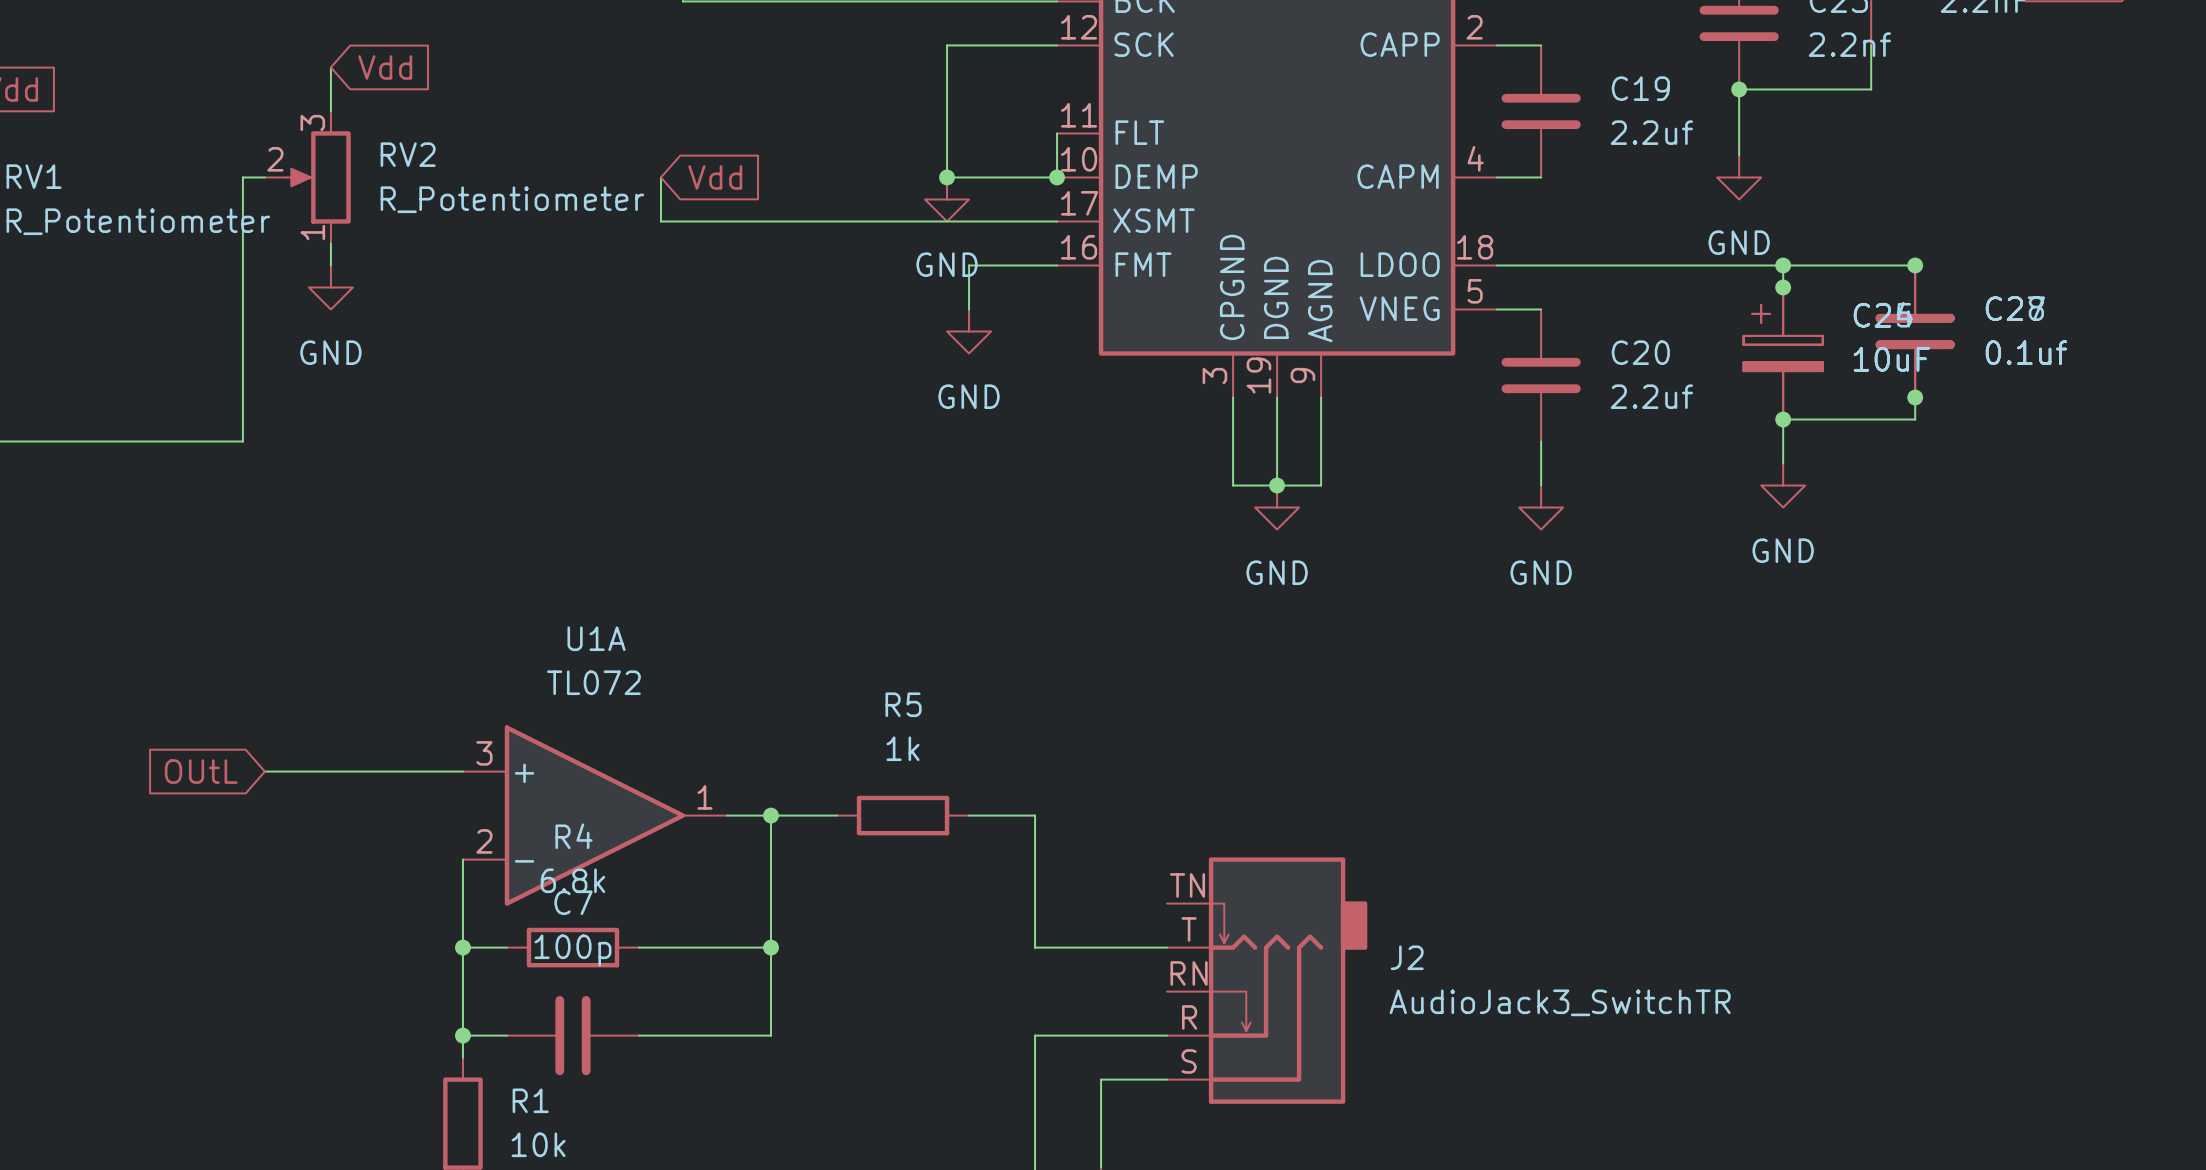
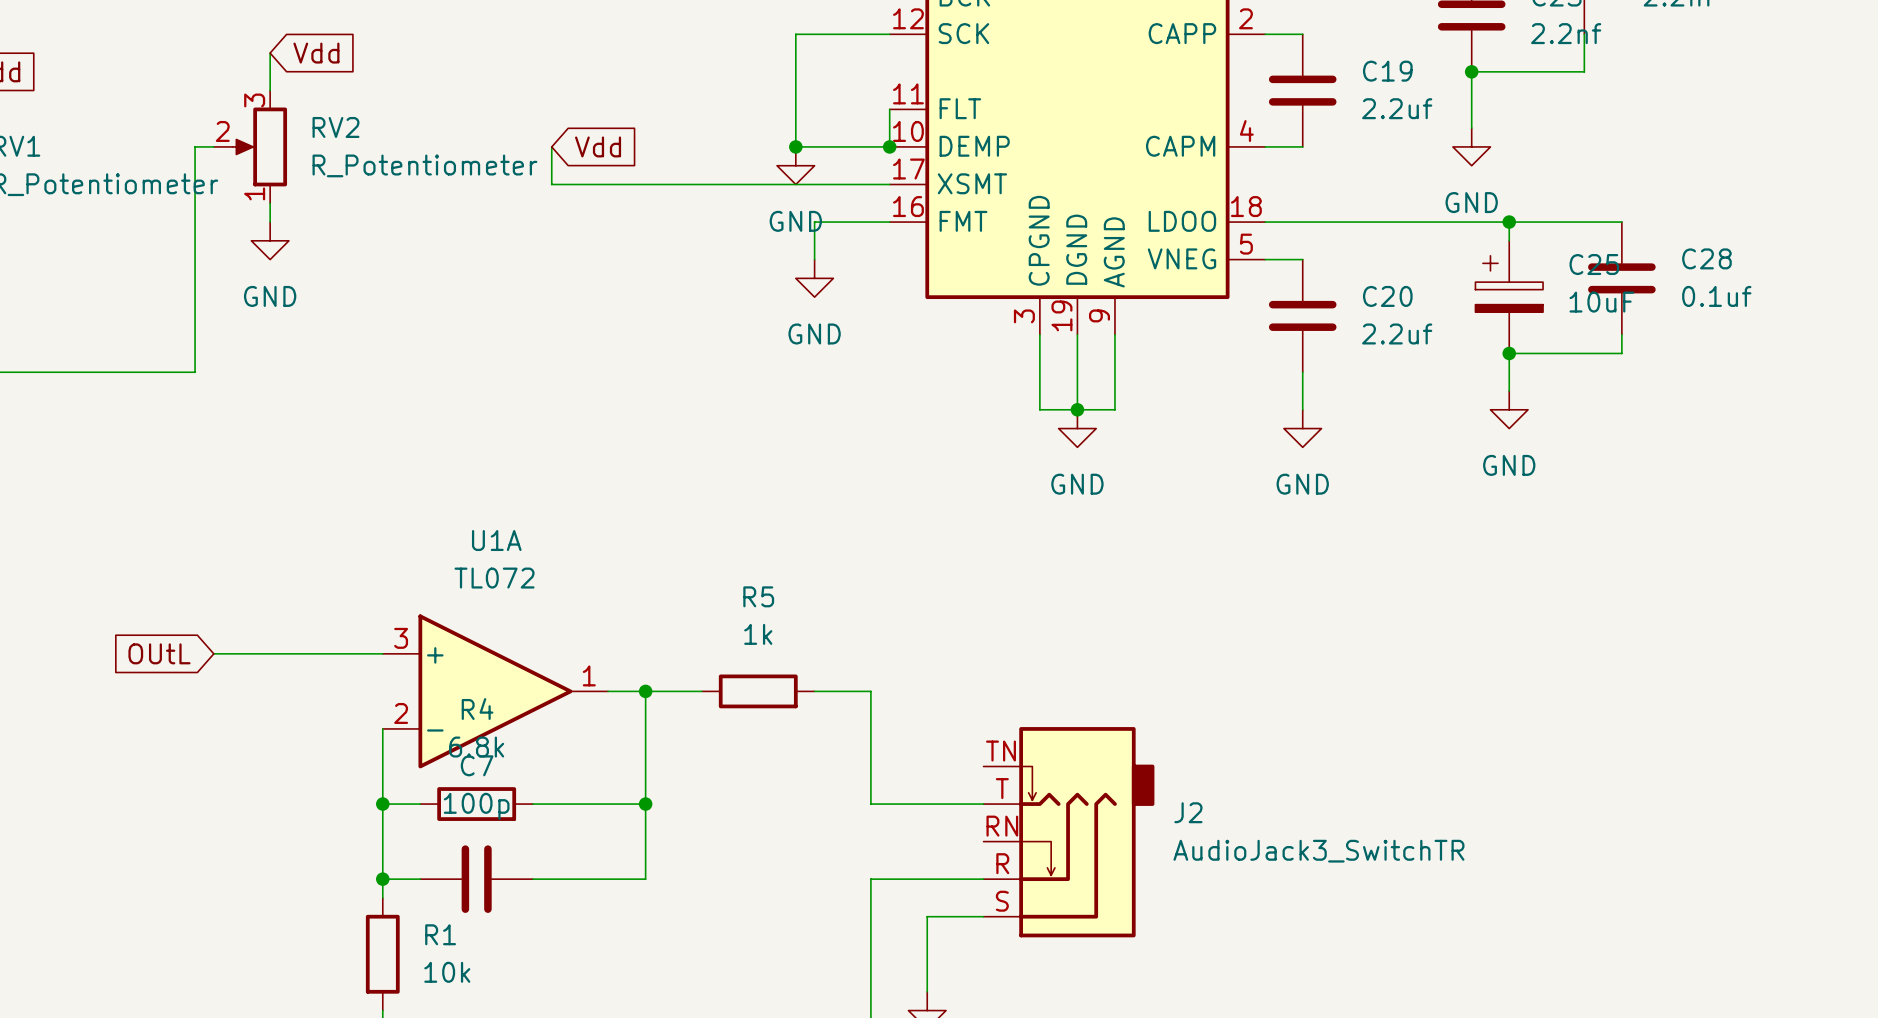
junction: (1915, 265) -> none
junction: (1783, 287) -> none
part: 0.1uf (1915, 331) -> none
part: 10uF (1783, 353) -> none
junction: (1915, 397) -> none

